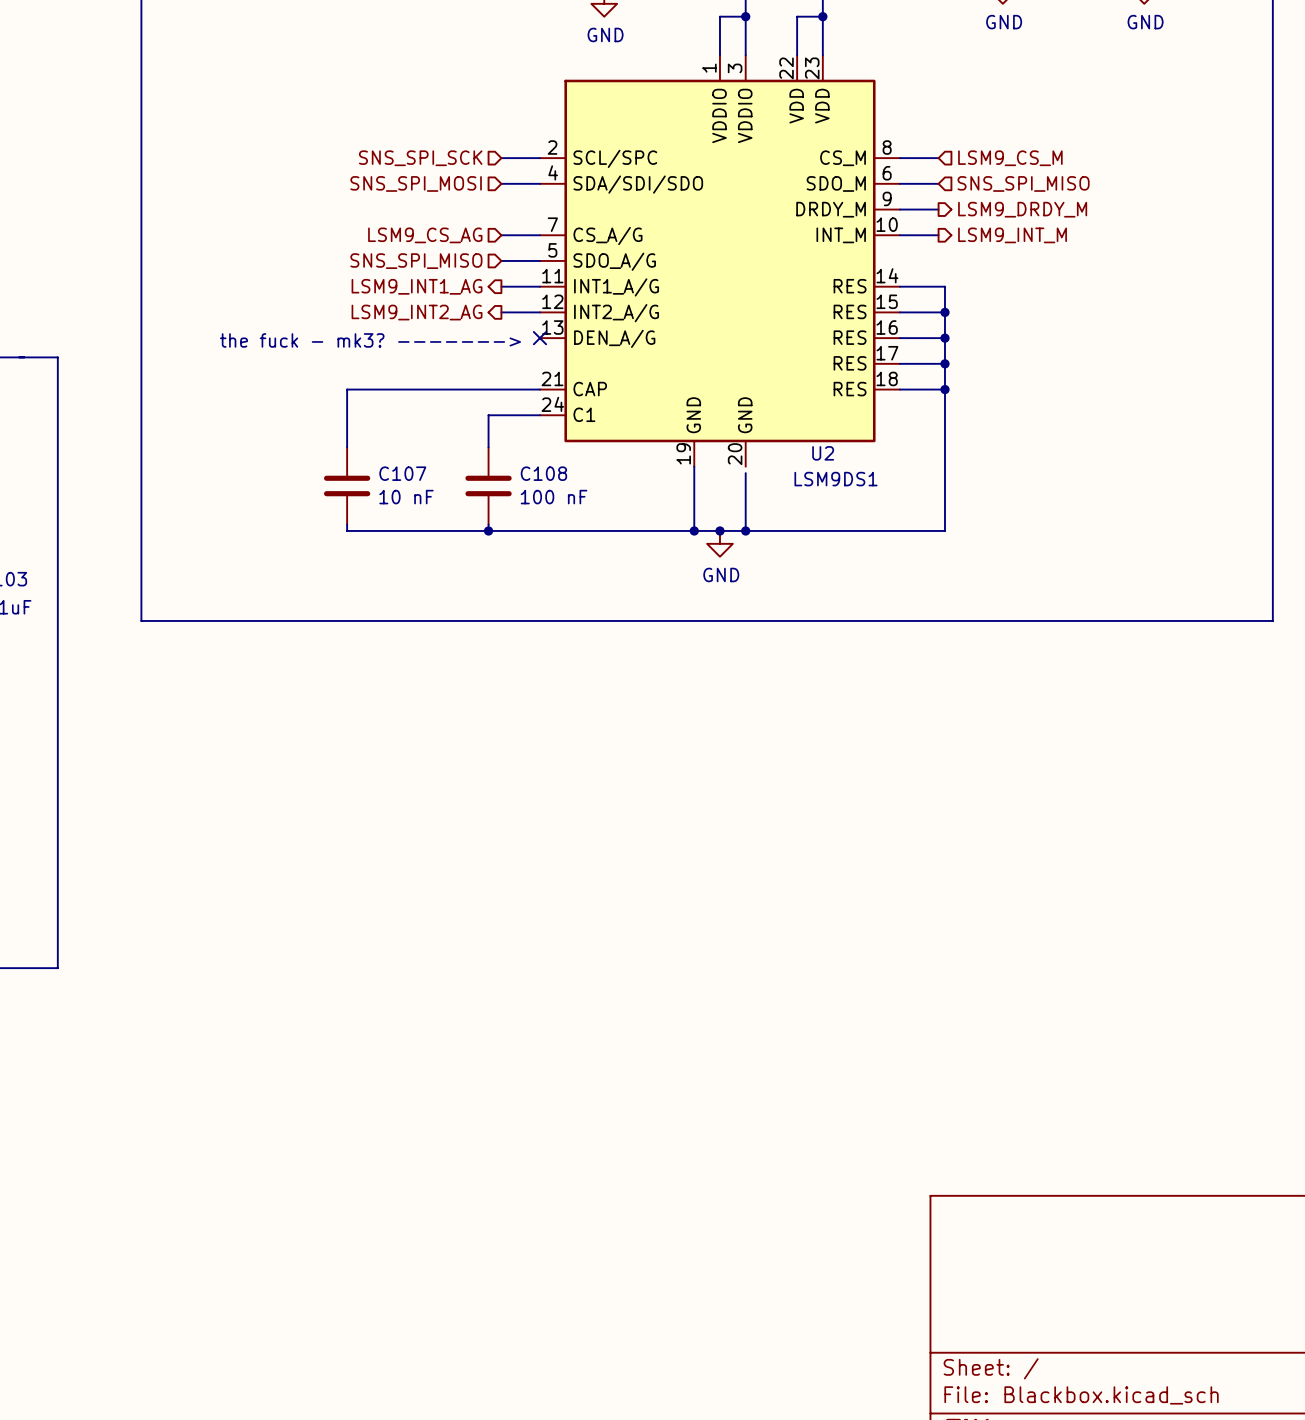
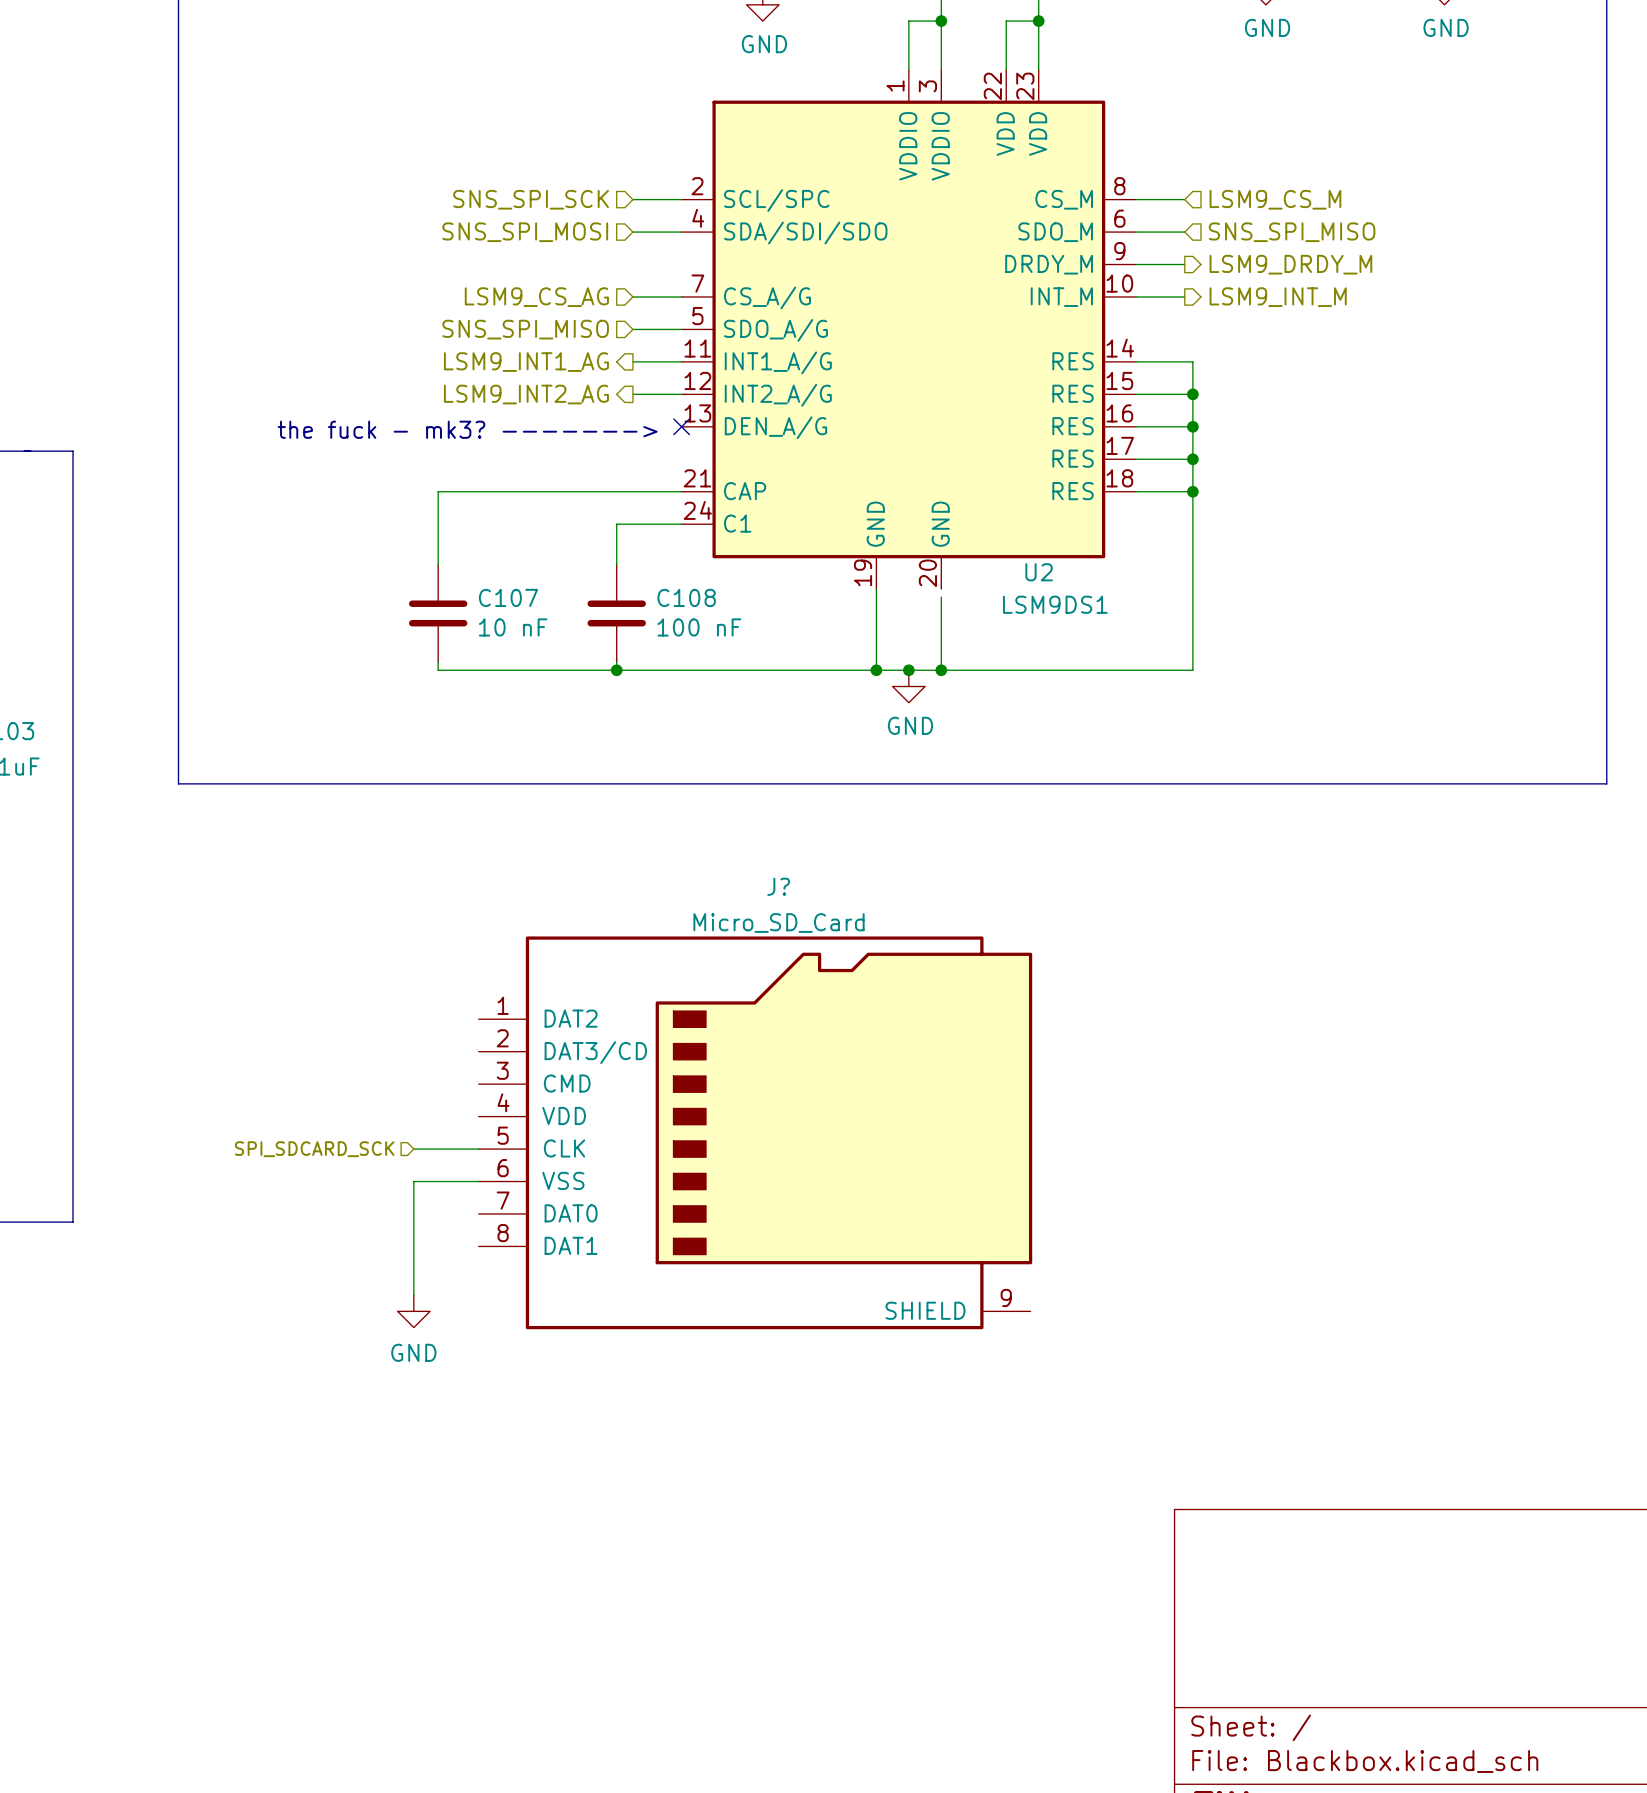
J?: none -> Micro_SD_Card (755, 1132)
hierarchical label: none -> SPI_SDCARD_SCK (314, 1149)
wire: none -> (413, 1149) (478, 1149)
wire: none -> (478, 1181) (413, 1181) (413, 1295)
power symbol: none -> GND (413, 1311)

